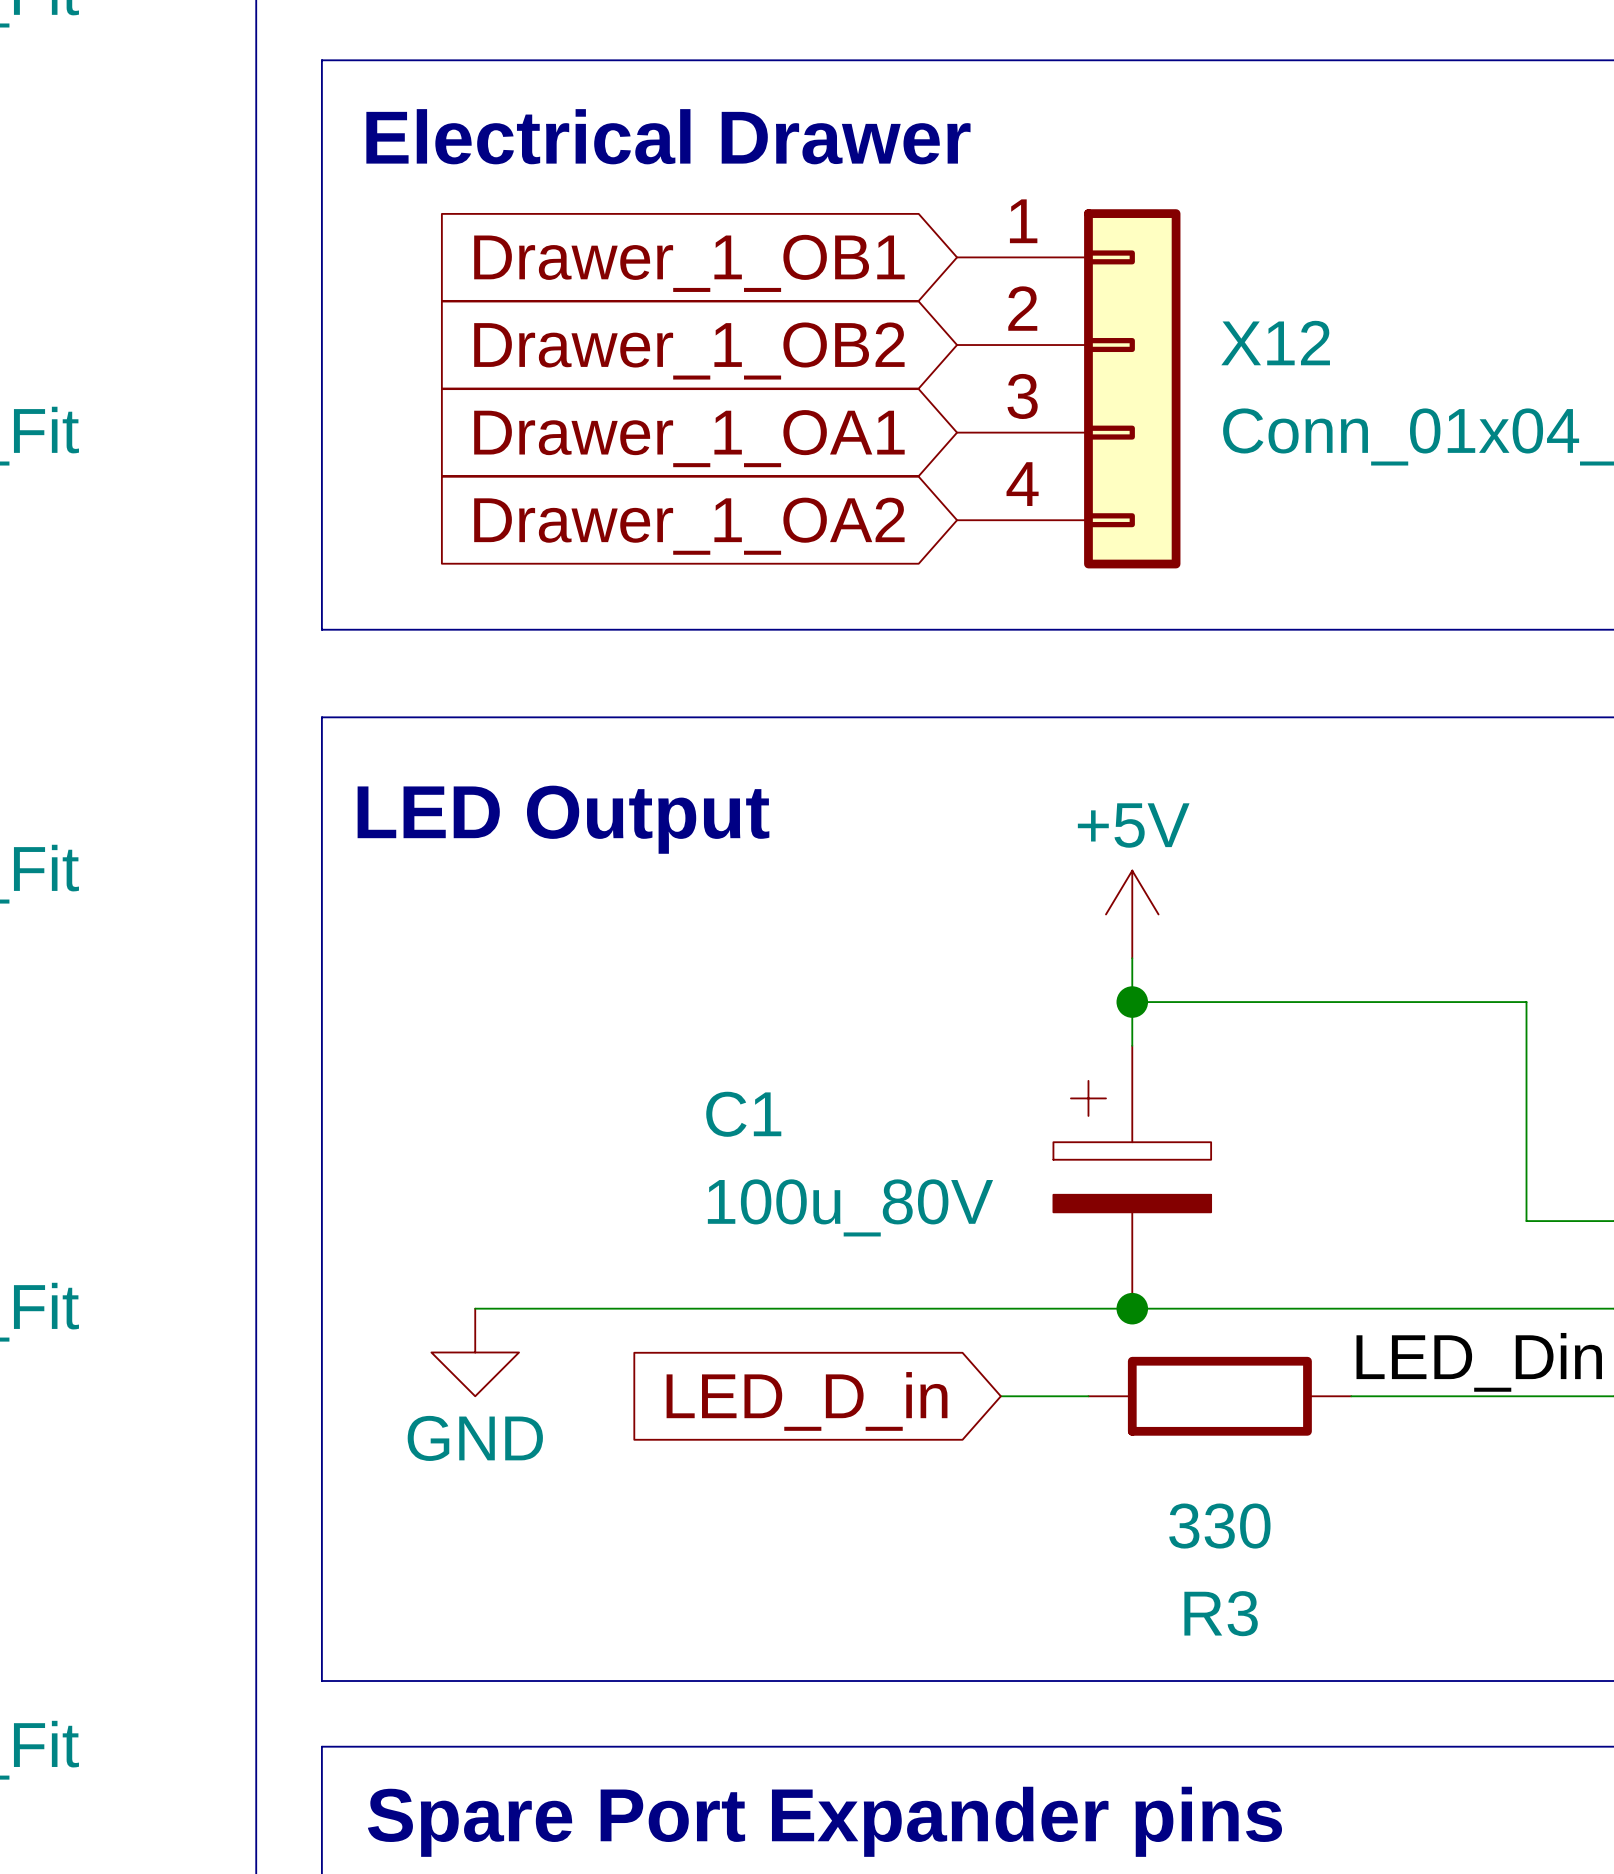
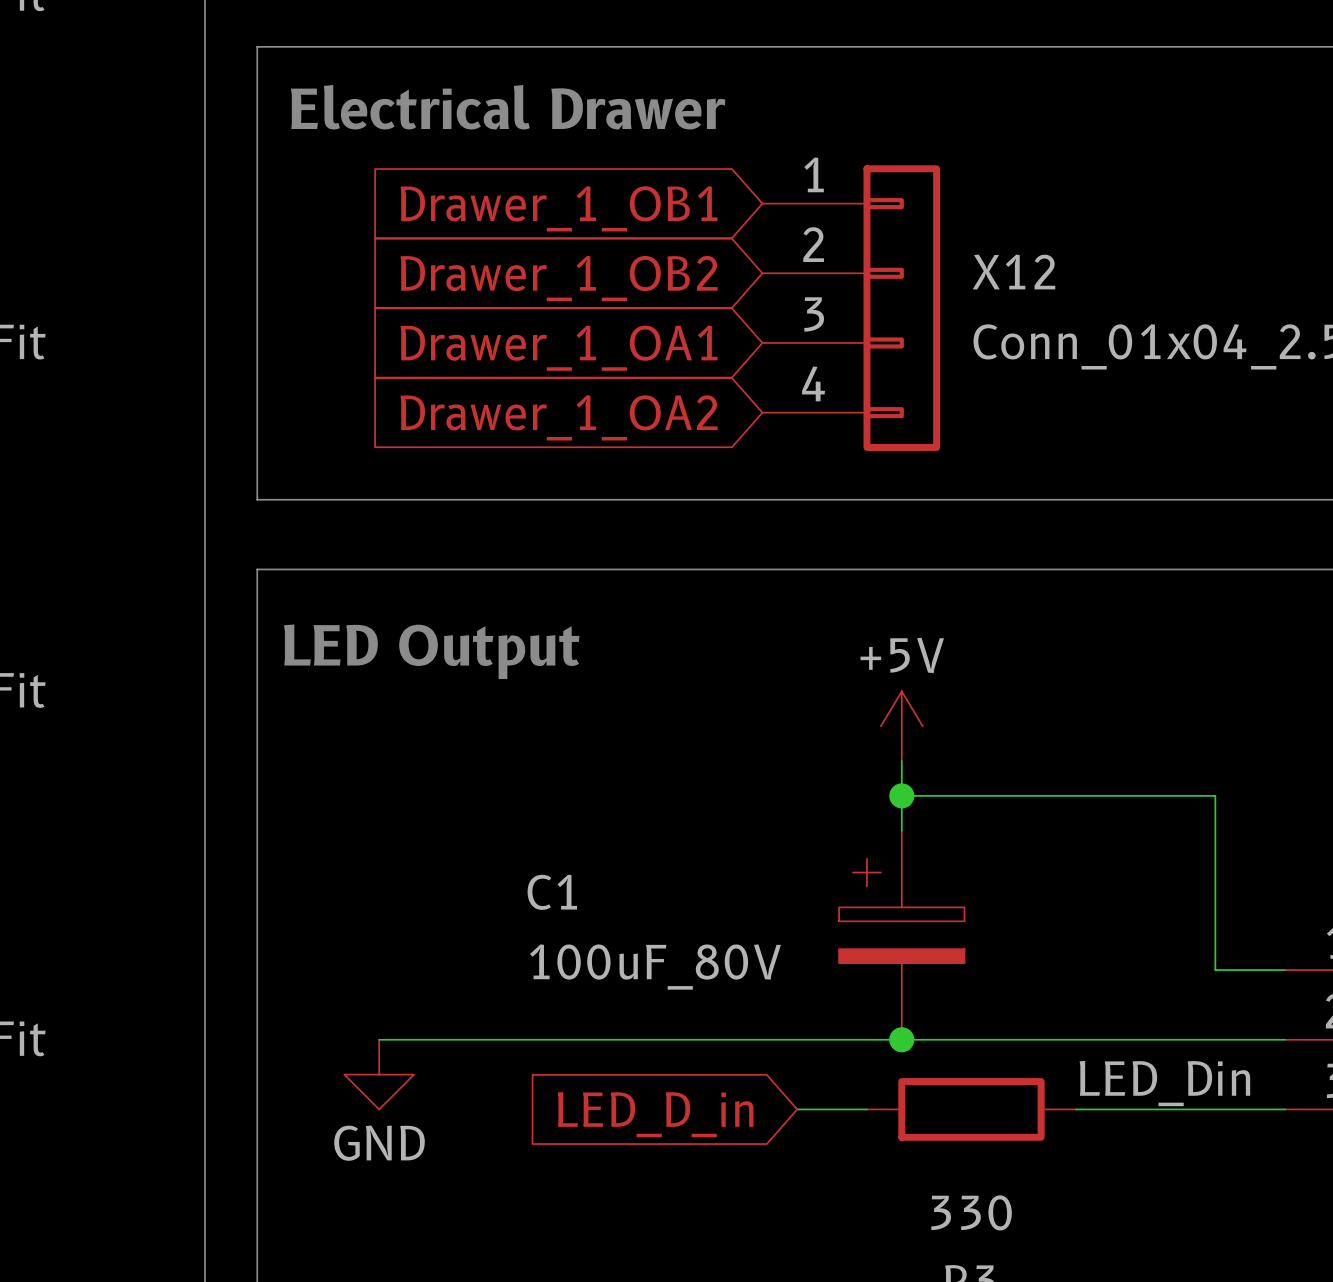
C1 name position: C1 (743, 1114) -> C1 (552, 892)
C1 value: 100u_80V (850, 1207) -> 100uF_80V (655, 967)

